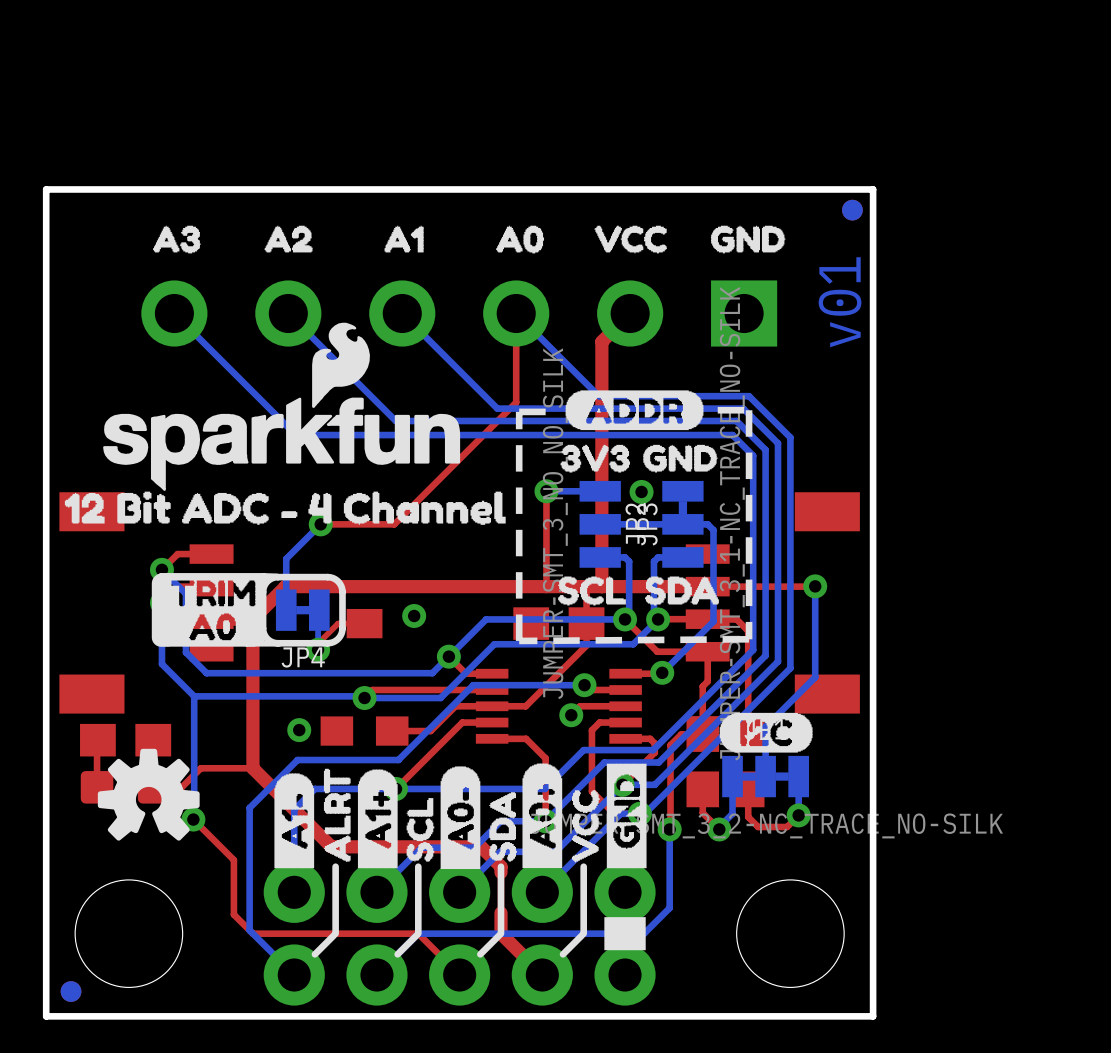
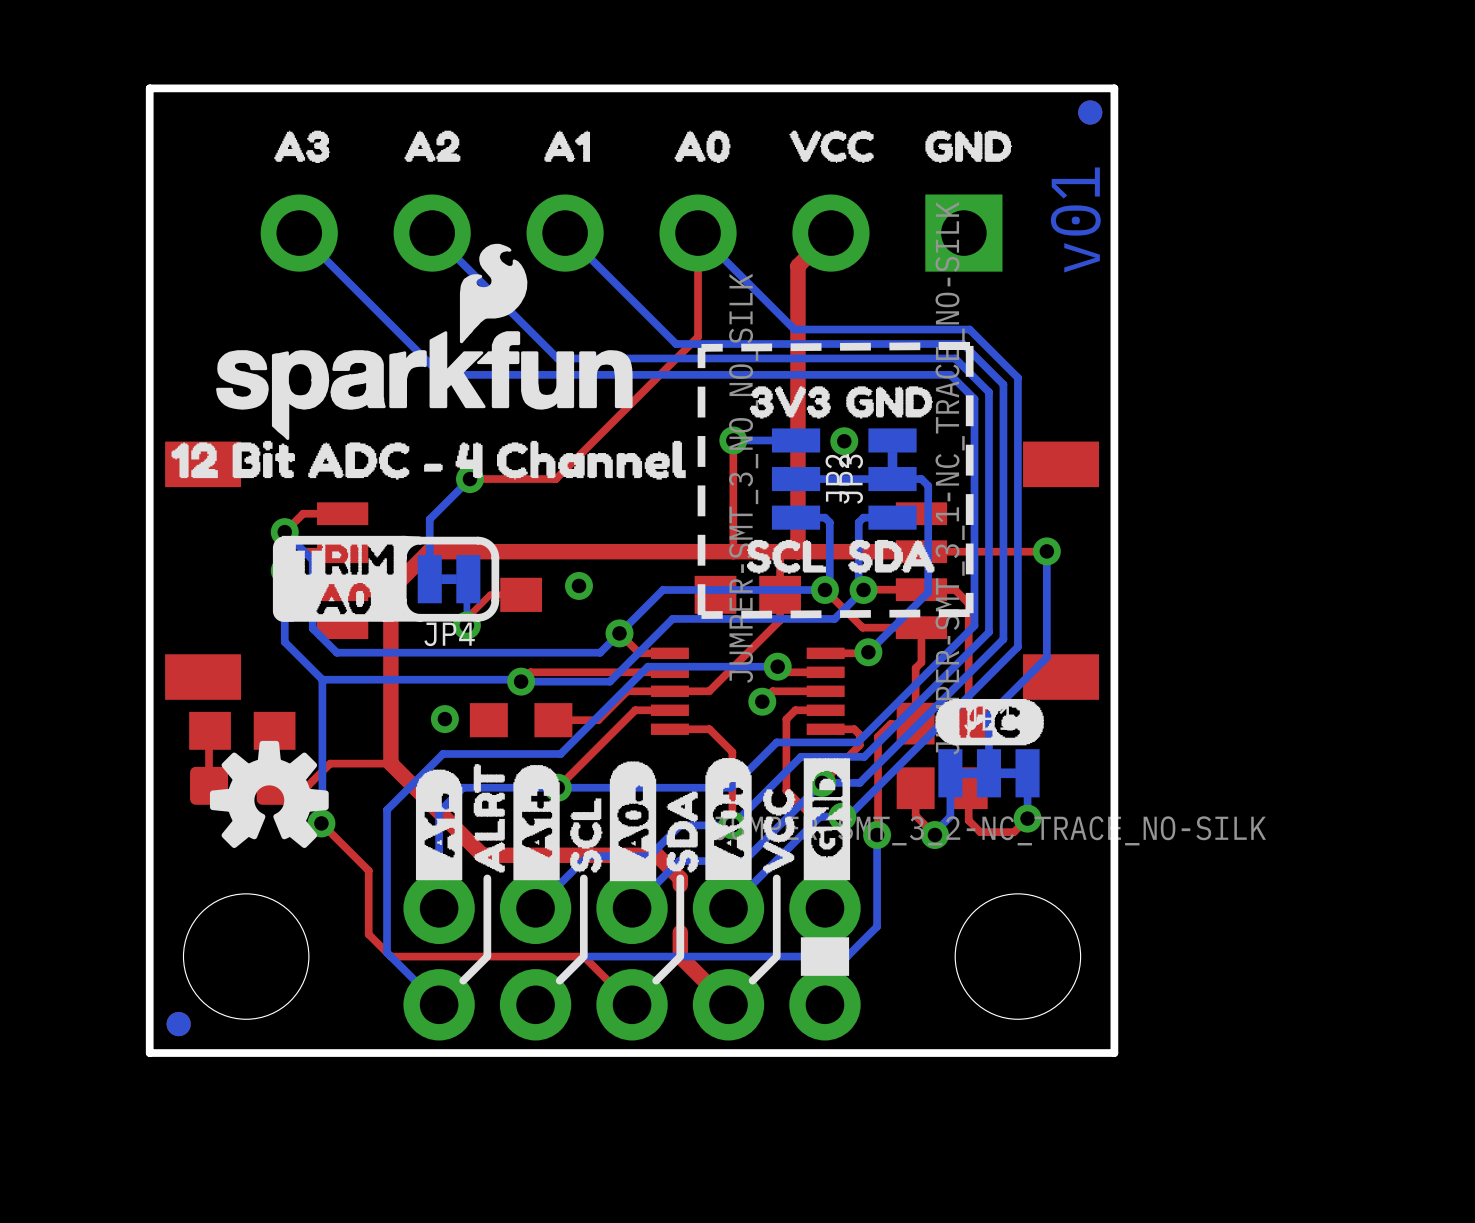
drawing: [565, 390, 704, 431] -> none
line: (552, 411) (519, 411) -> (969, 345) (701, 347)

